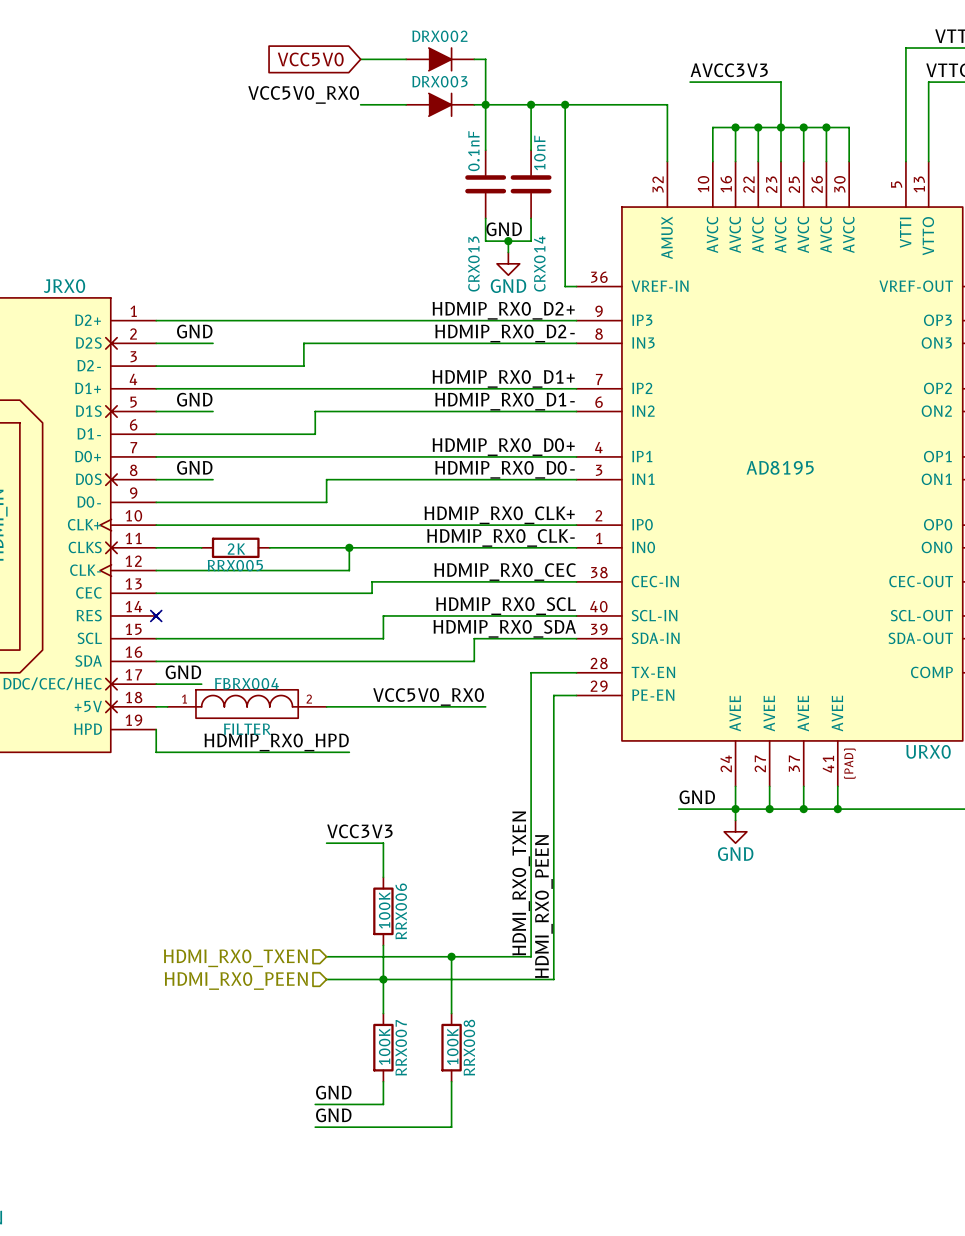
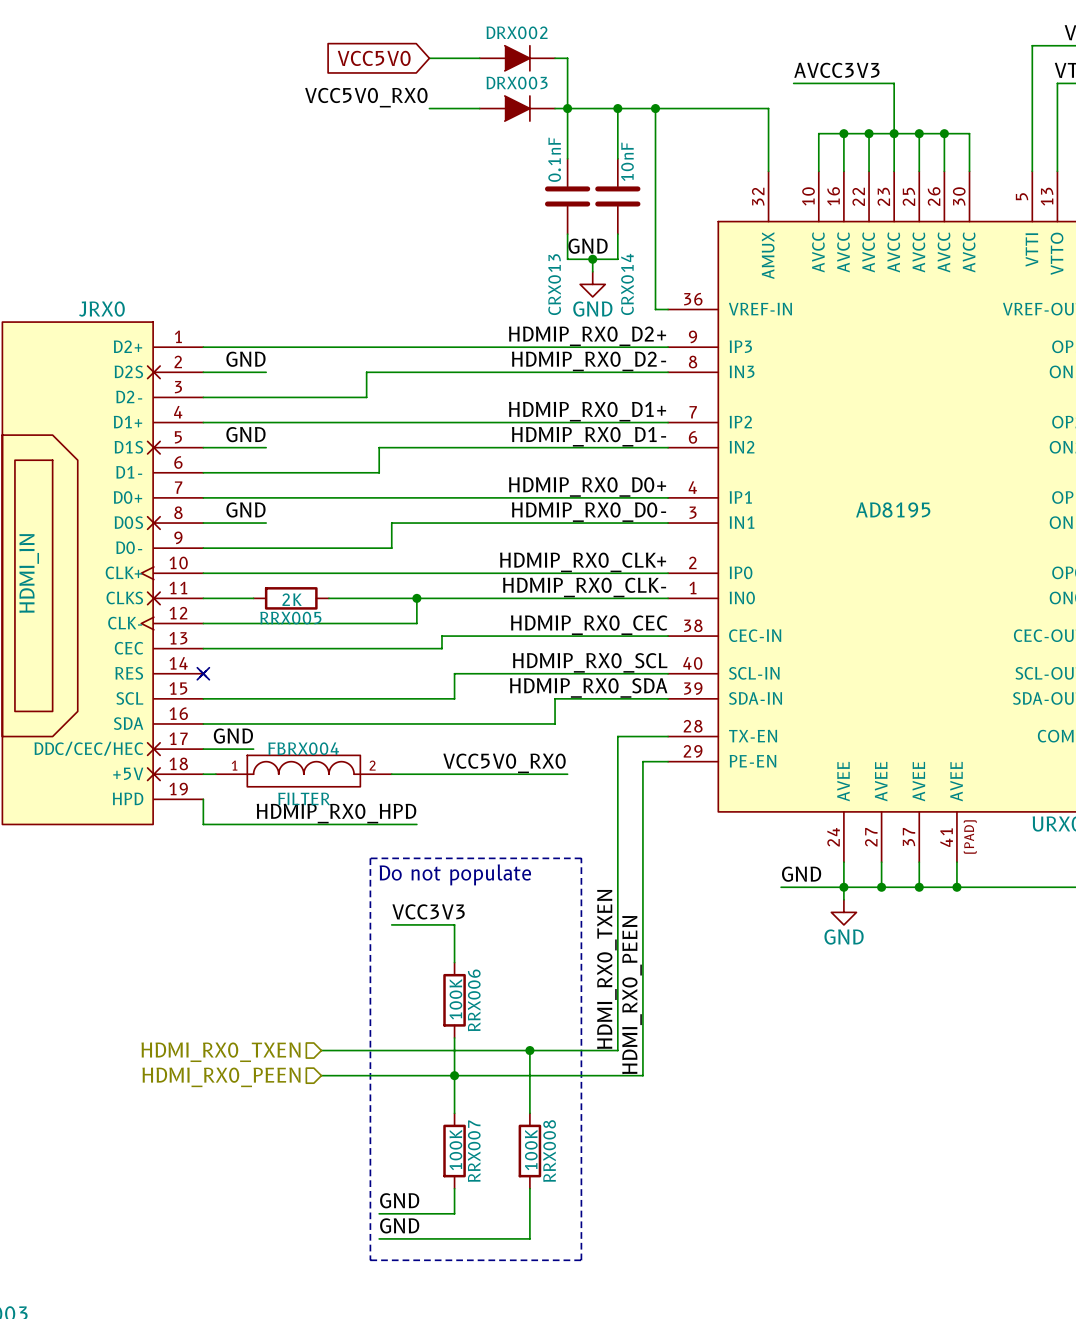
line: none -> (370, 858) (370, 1260) (581, 1260) (581, 858) (370, 858)
text: none -> Do not populate (455, 874)
wire: none -> (321, 1050) (391, 1050)
hierarchical label position: HDMI_RX0_TXEN (235, 958) -> HDMI_RX0_TXEN (221, 1052)
wire: none -> (321, 1075) (391, 1075)
hierarchical label position: HDMI_RX0_PEEN (236, 981) -> HDMI_RX0_PEEN (221, 1077)

